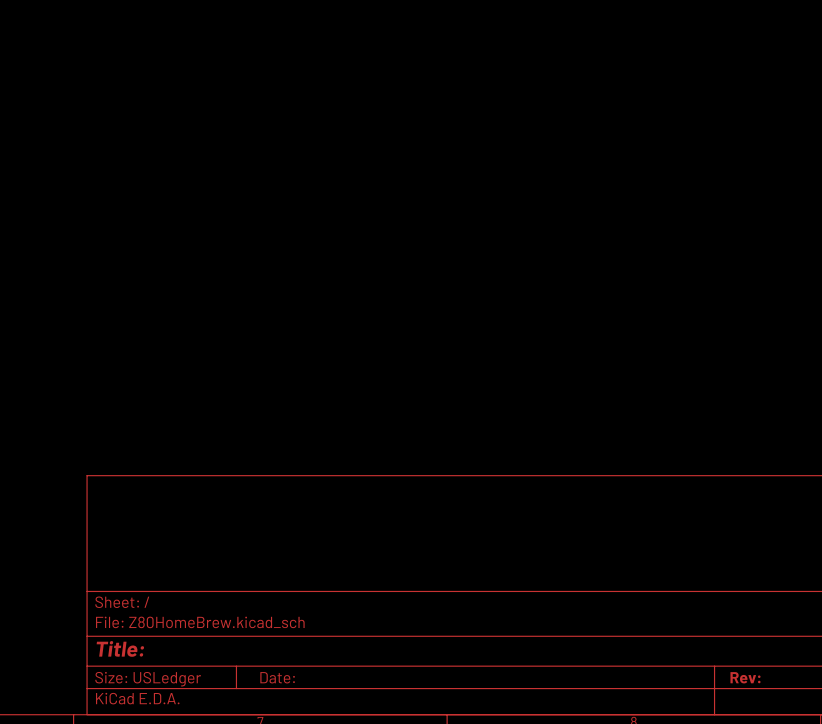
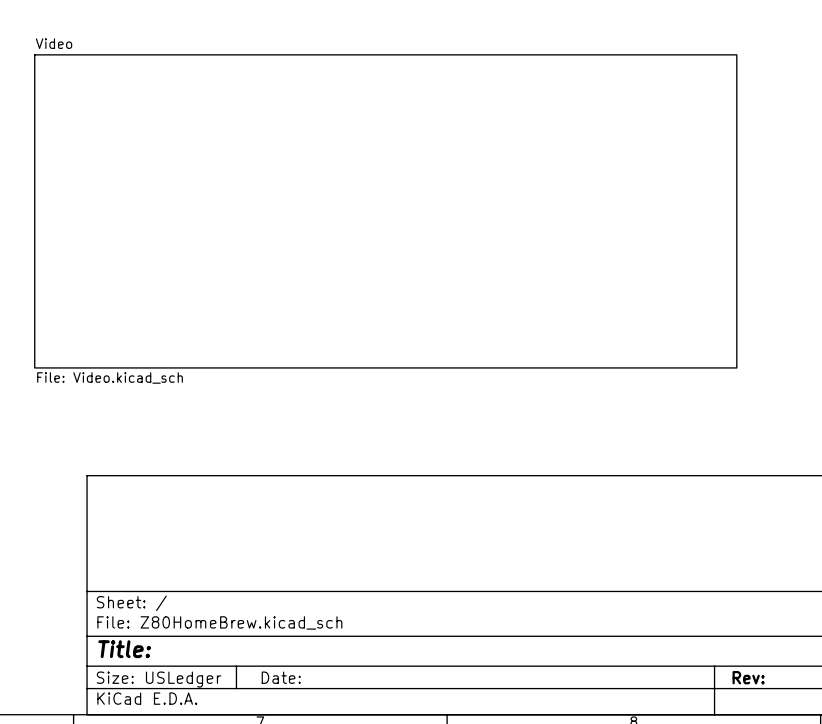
sheet Video: none -> File: Video.kicad_sch (385, 211)

